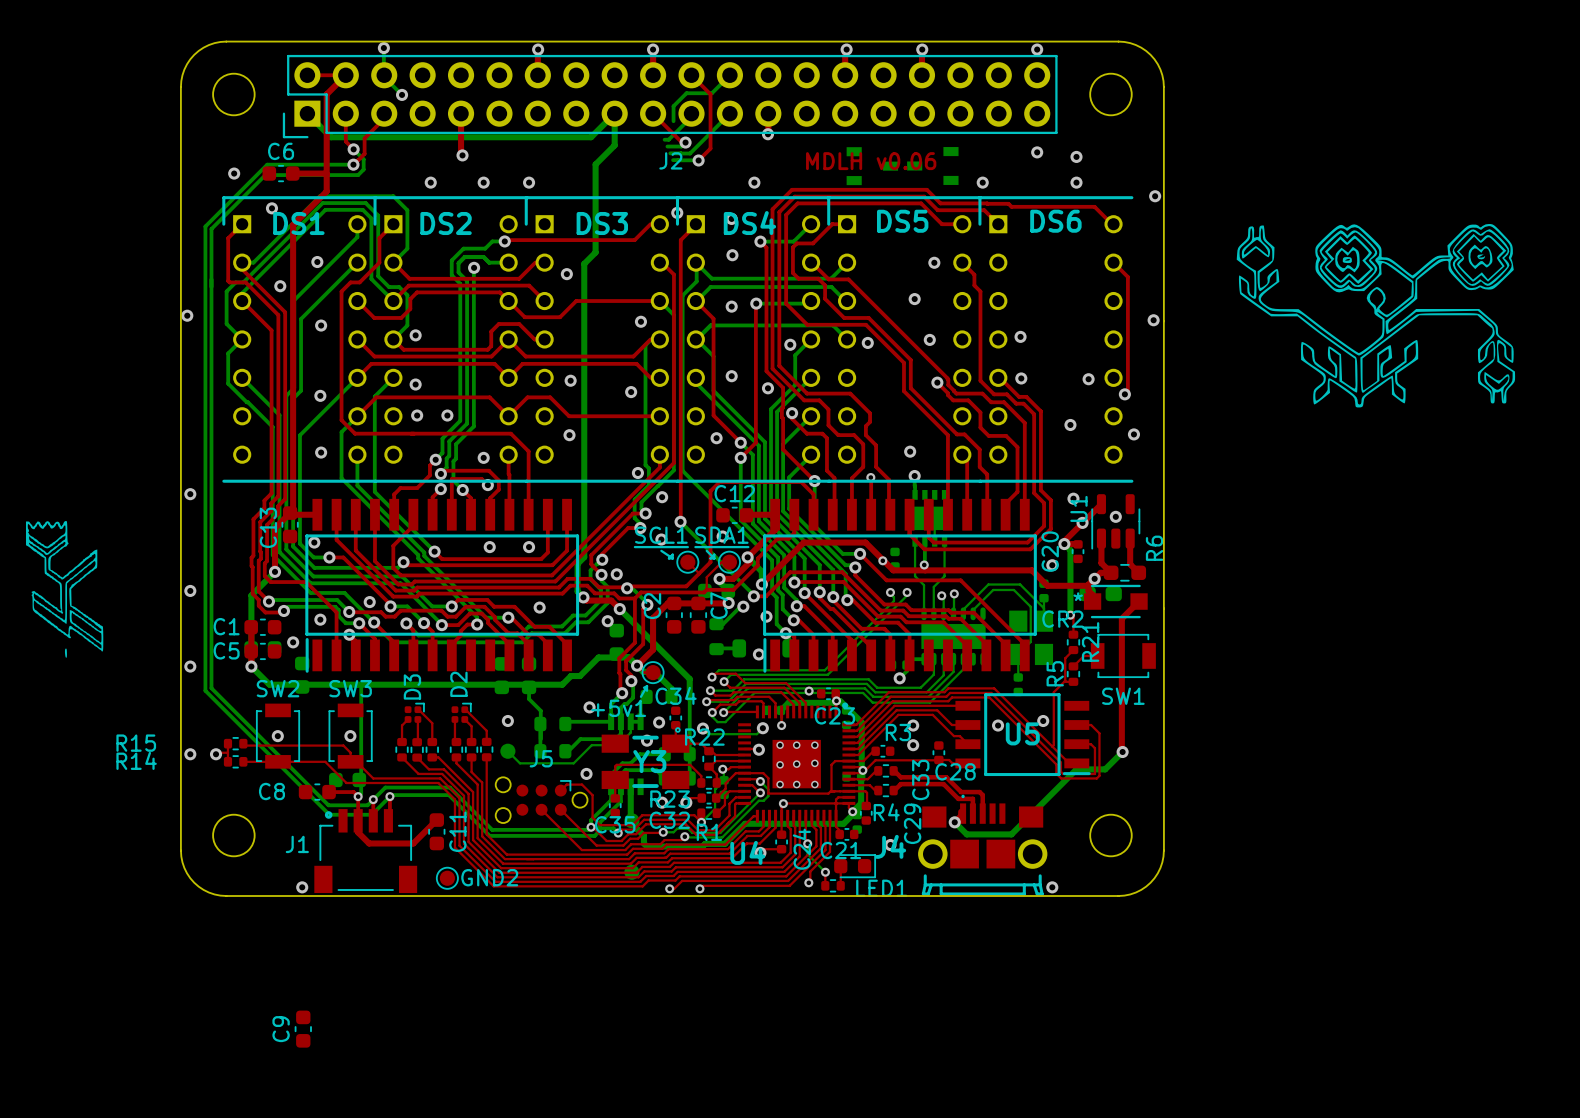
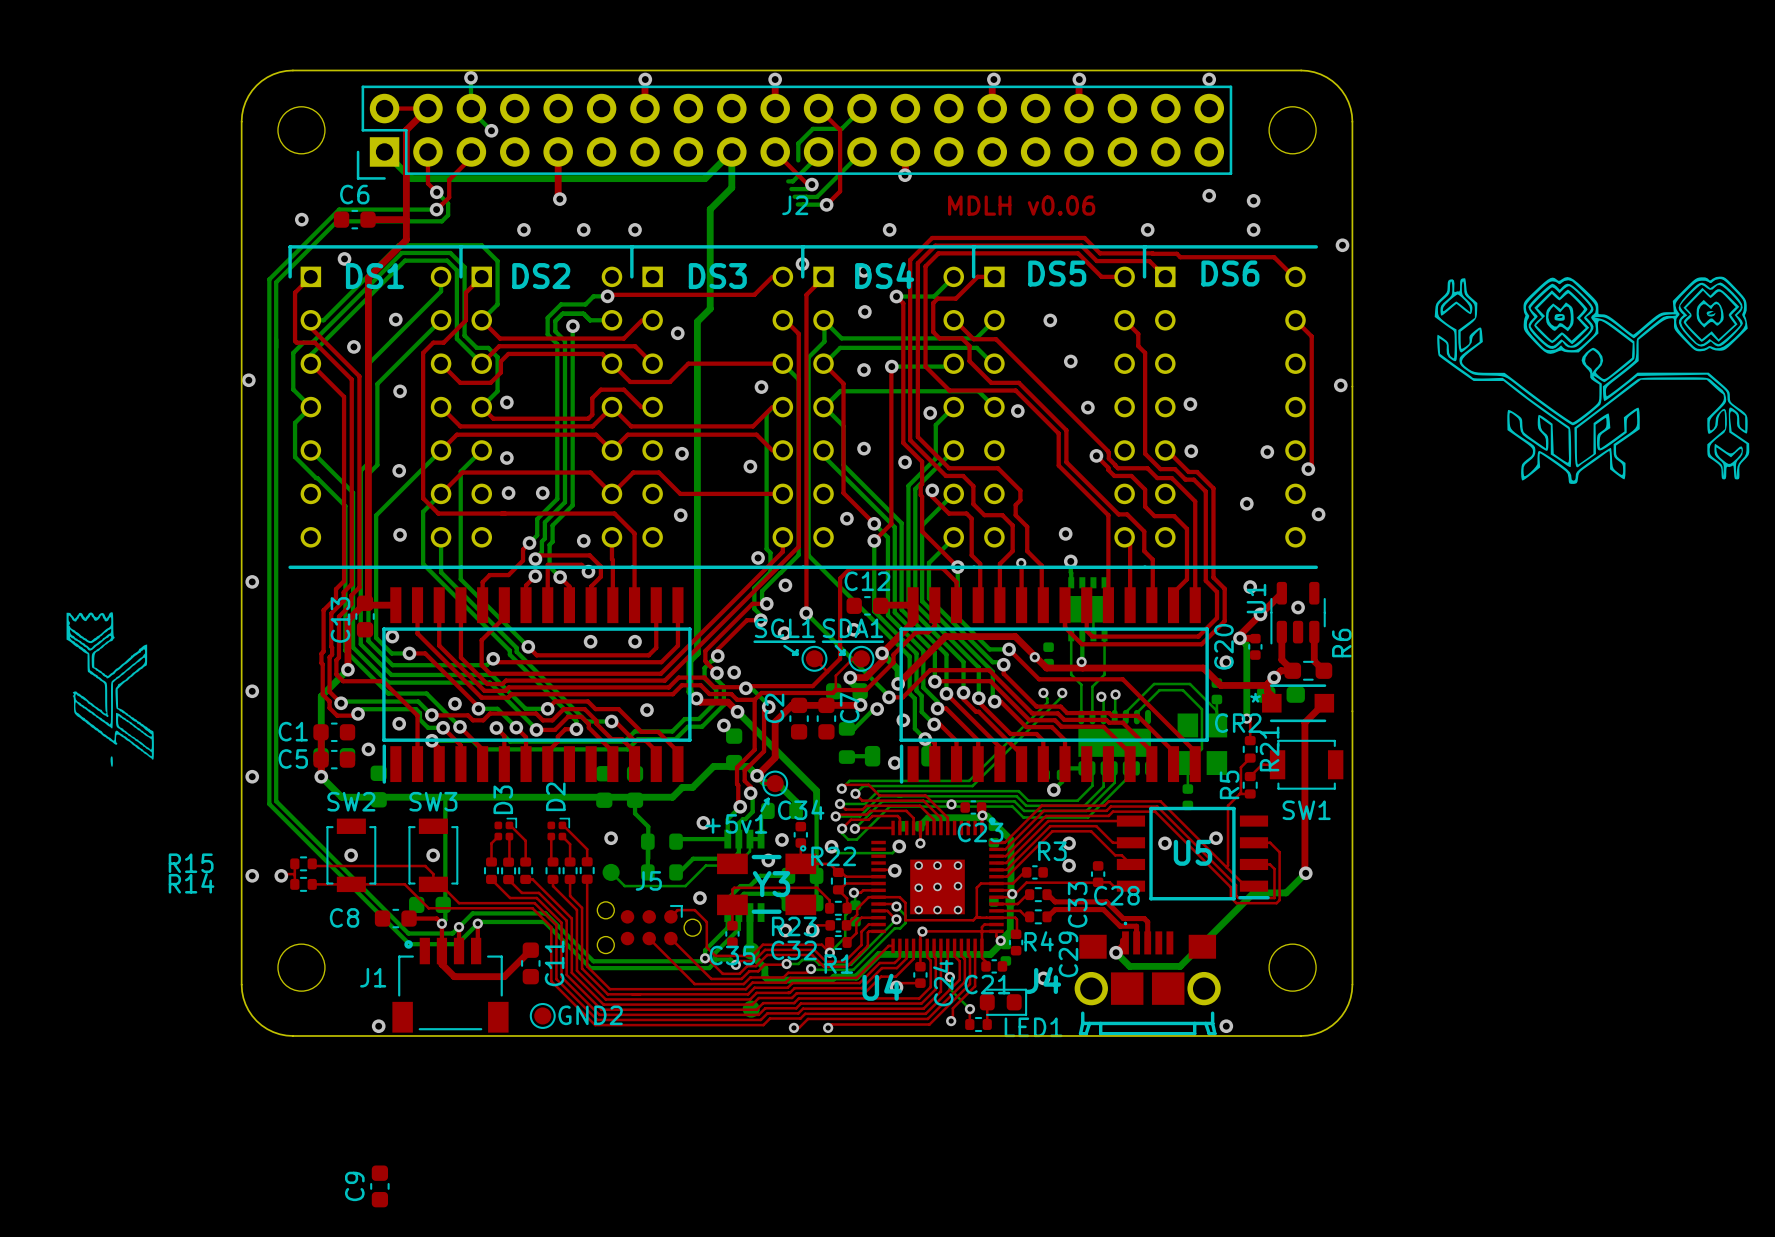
part: (872, 166) -> none
part: (932, 166) -> none
via position: (934, 262) -> (1050, 320)

